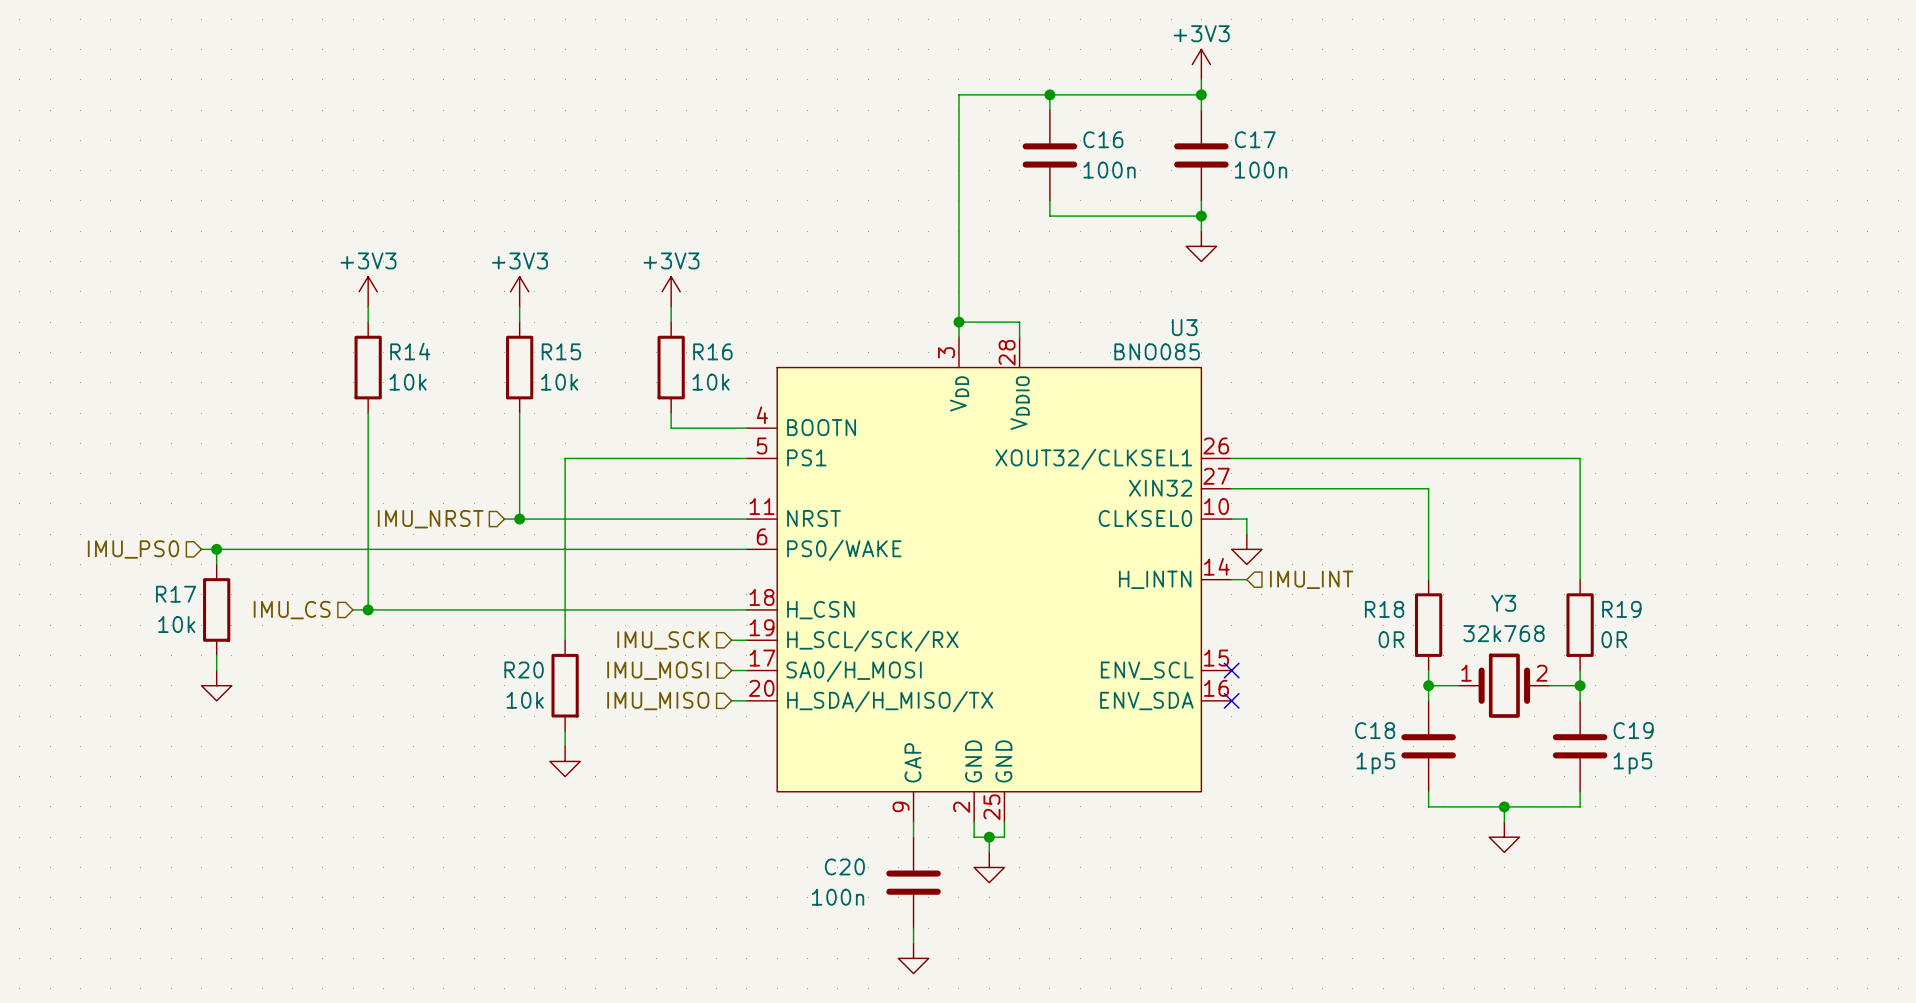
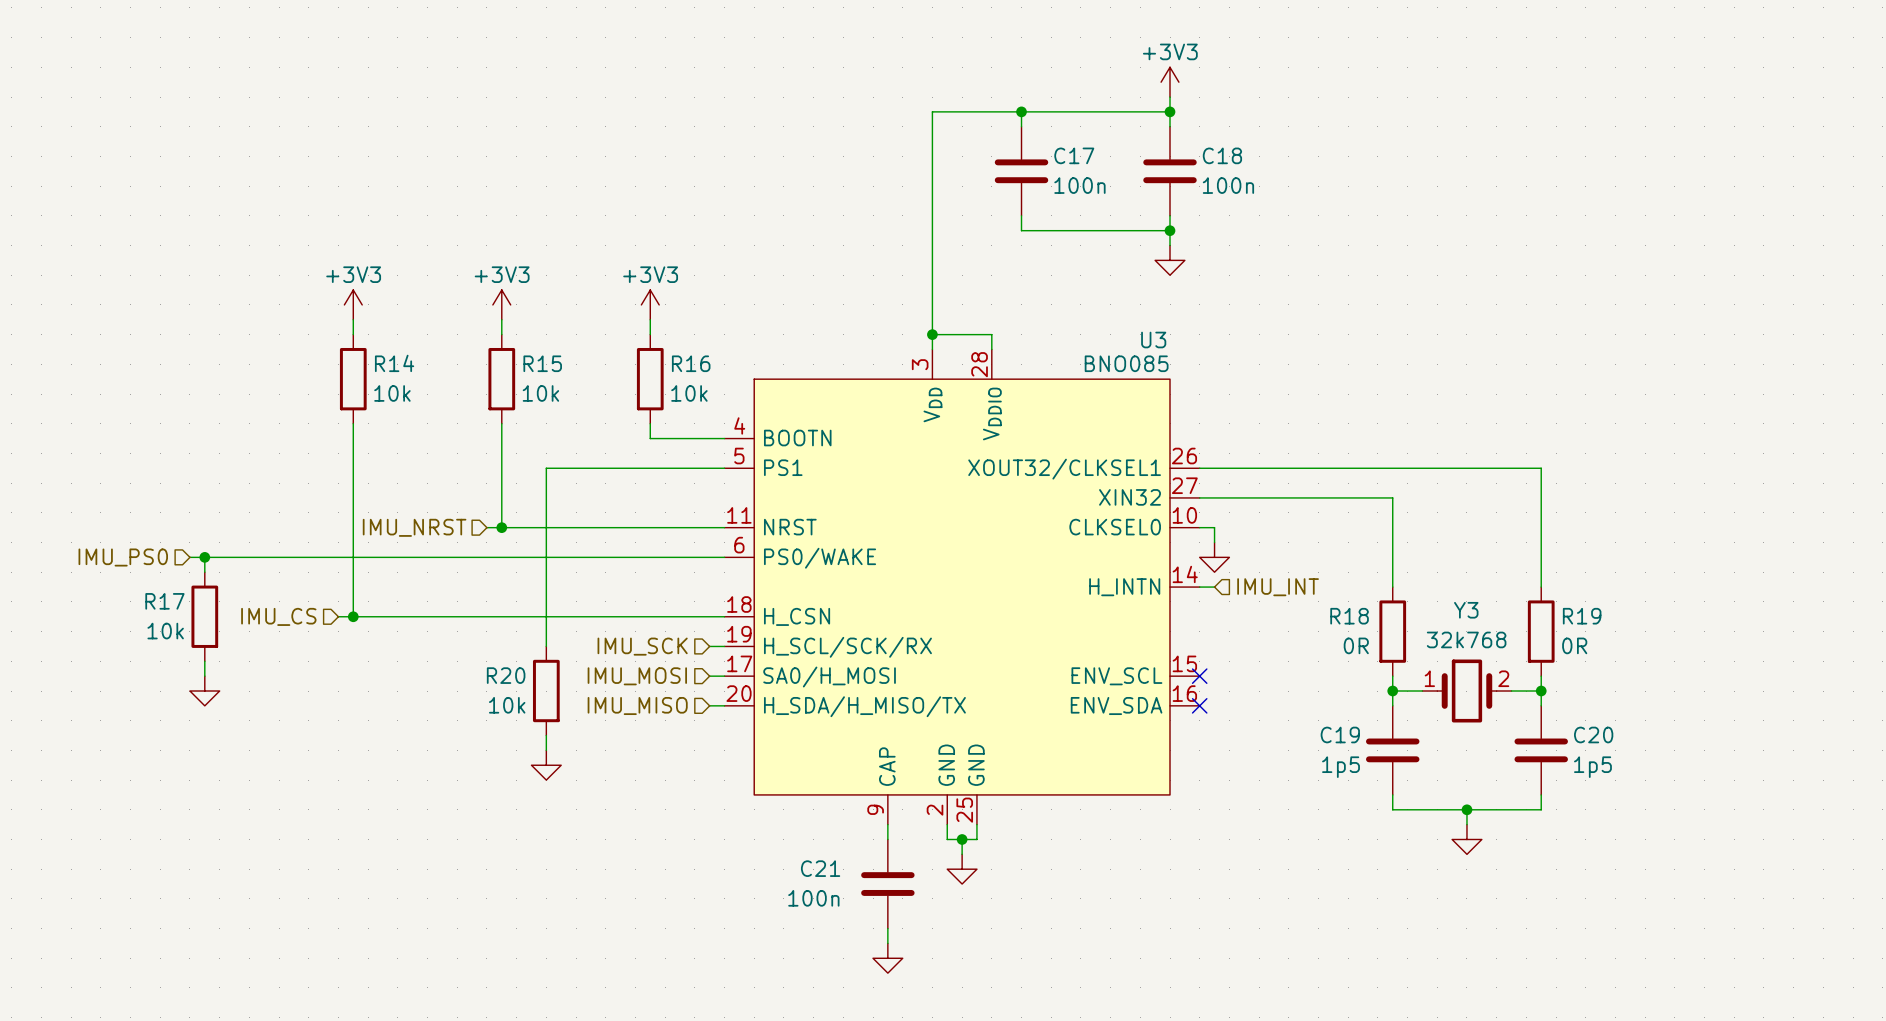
C16 name: C16 (1103, 139) -> C17 (1074, 155)
C17 name: C17 (1255, 139) -> C18 (1222, 155)
C18 name: C18 (1375, 730) -> C19 (1340, 734)
C19 name: C19 (1633, 730) -> C20 (1593, 734)
C20 name: C20 (844, 866) -> C21 (820, 868)

